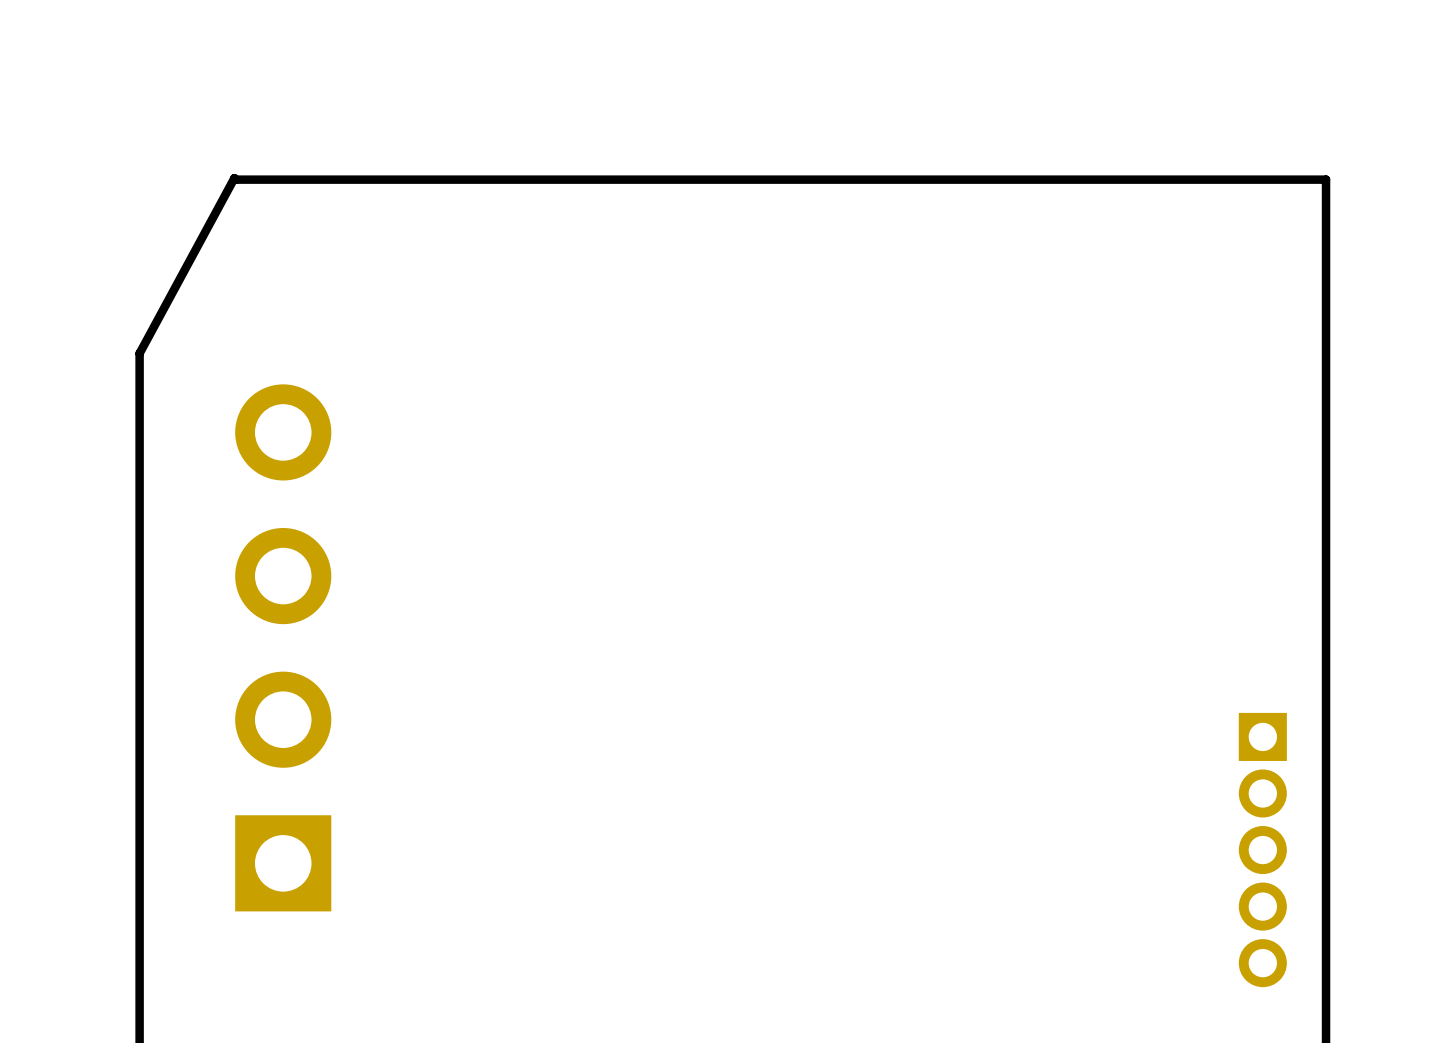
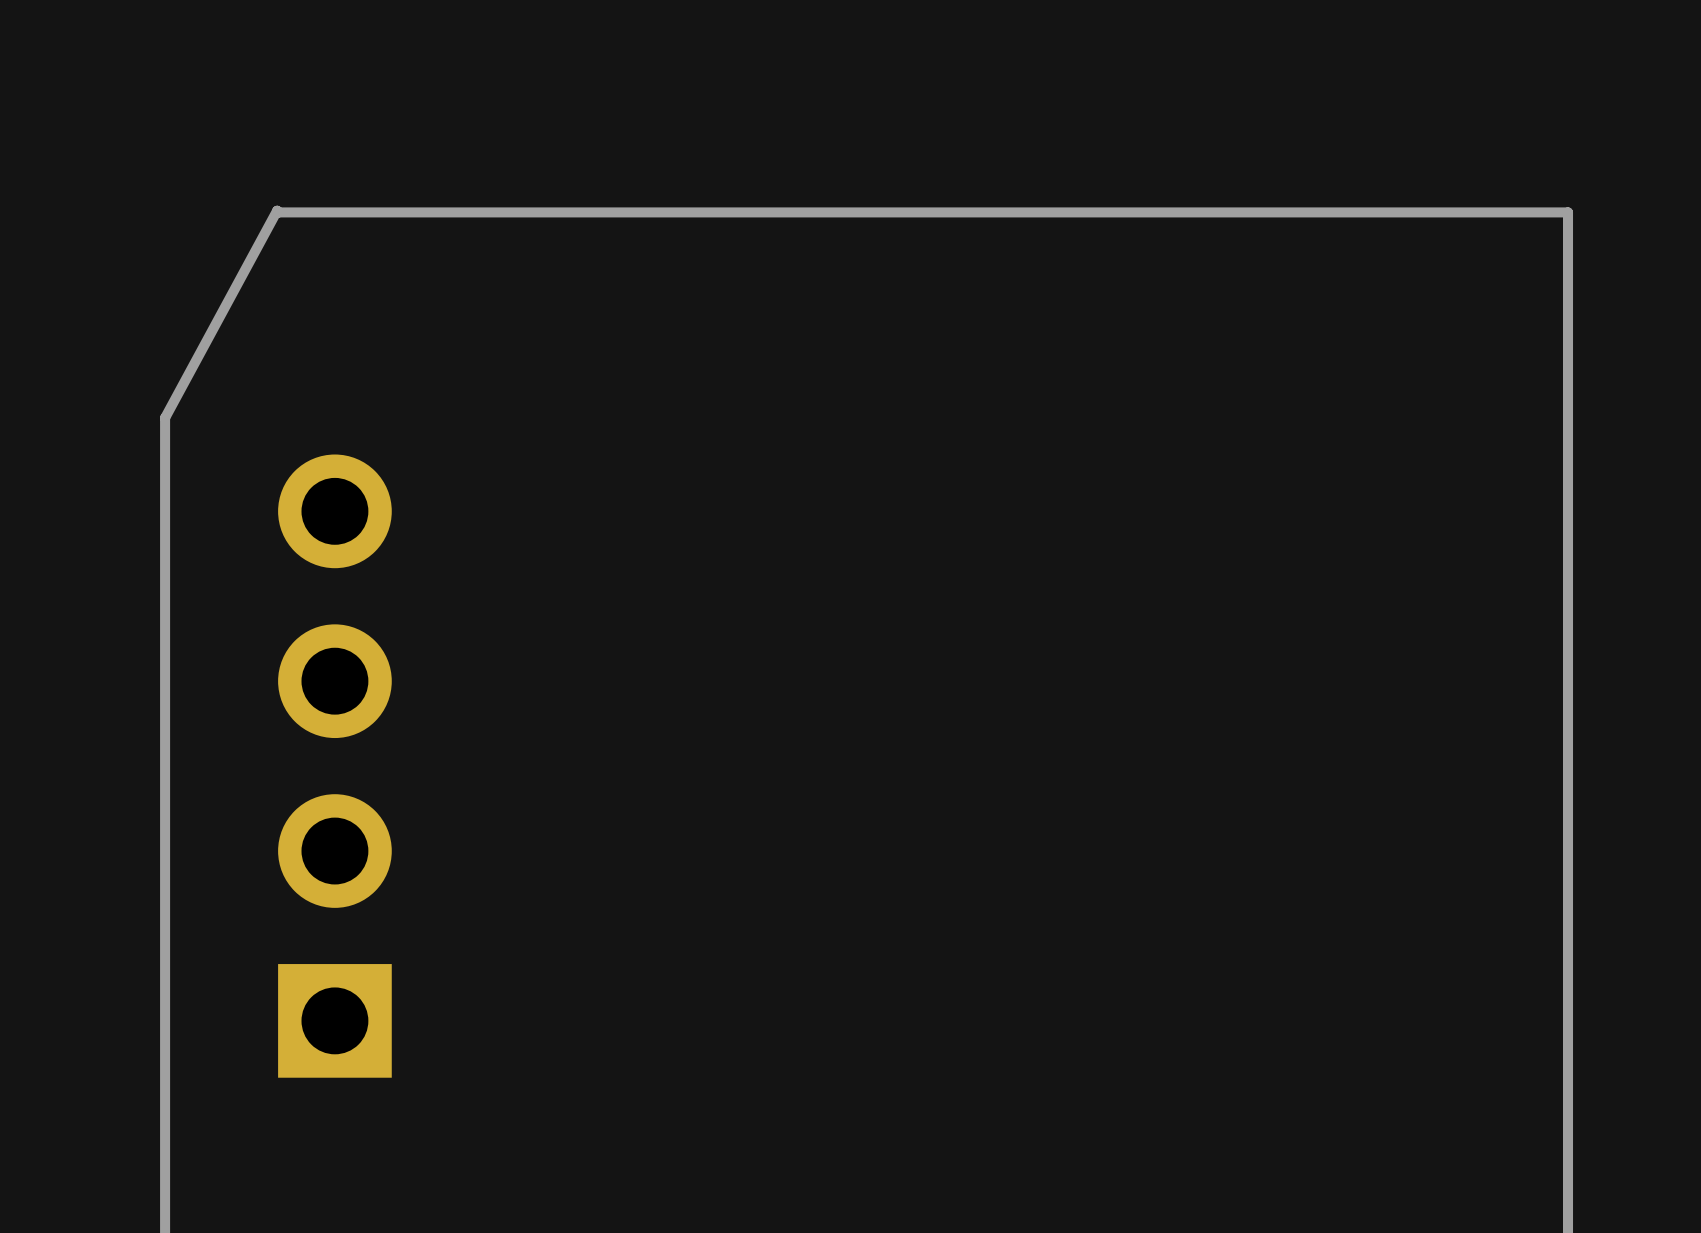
part: (1262, 850) -> none

